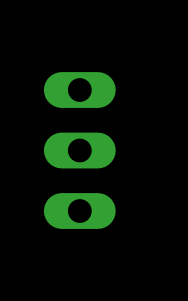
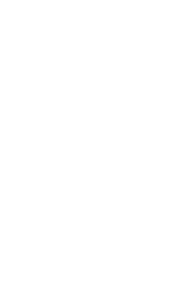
part: (79, 150) -> none

